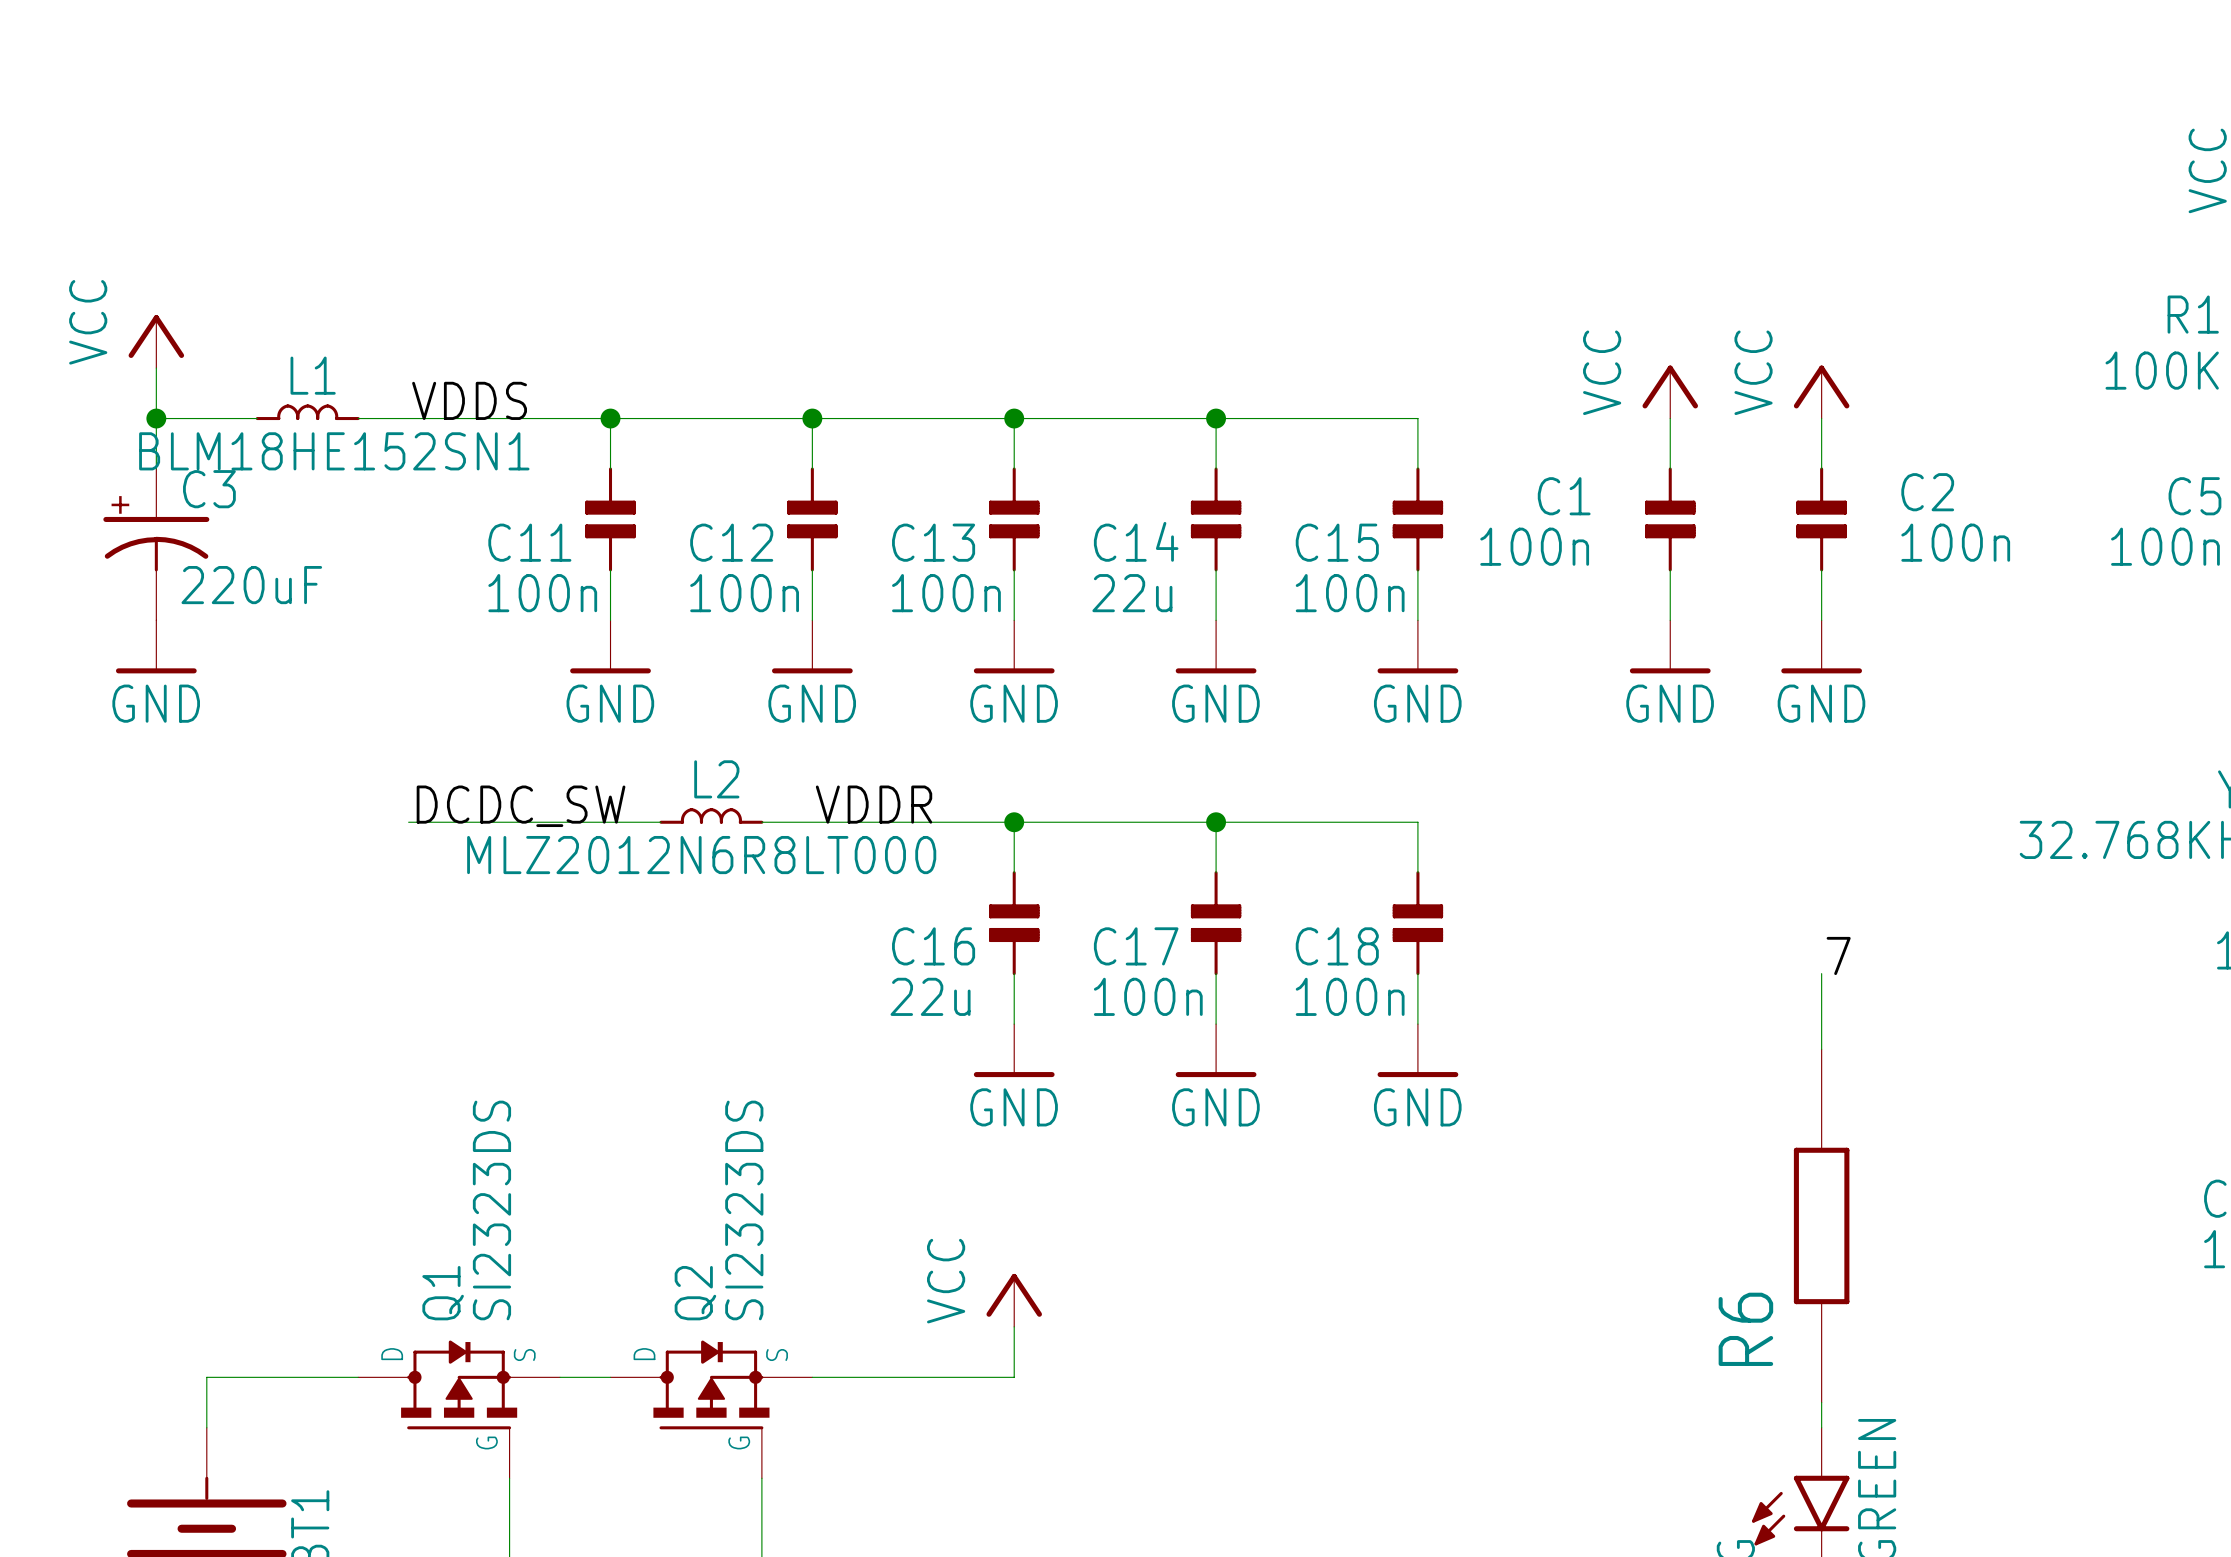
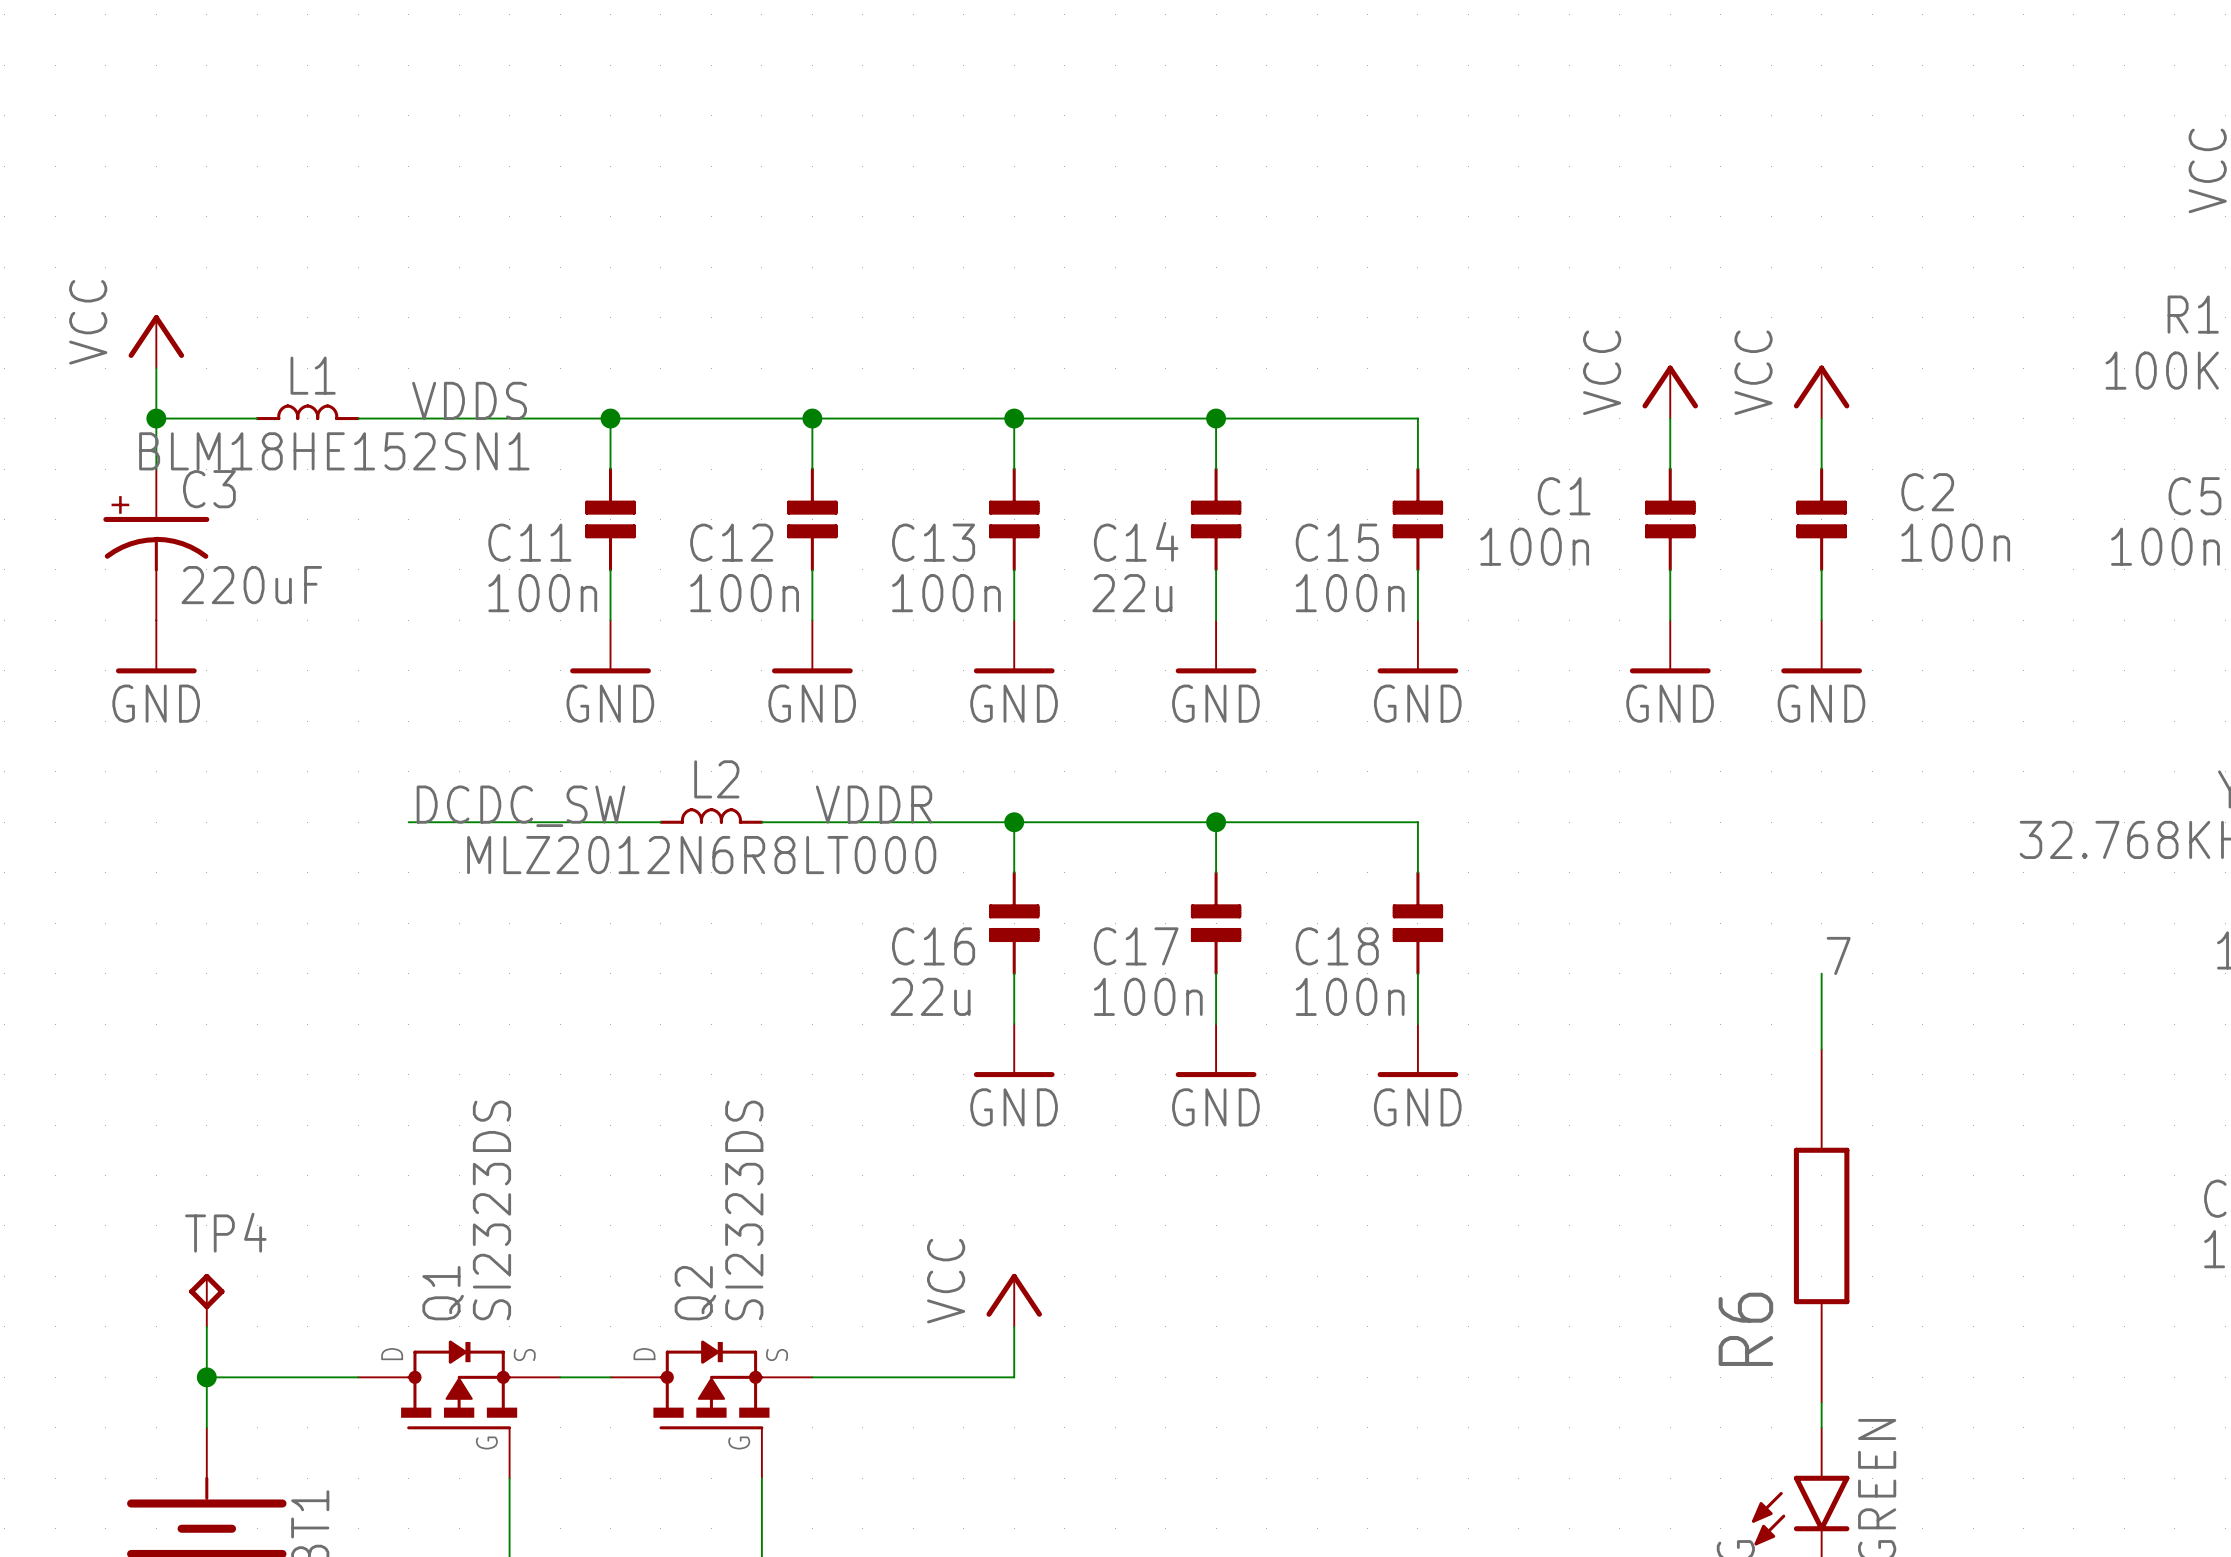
TP4: none -> (206, 1300)
wire: none -> (206, 1326) (206, 1377)
junction: none -> (206, 1377)

